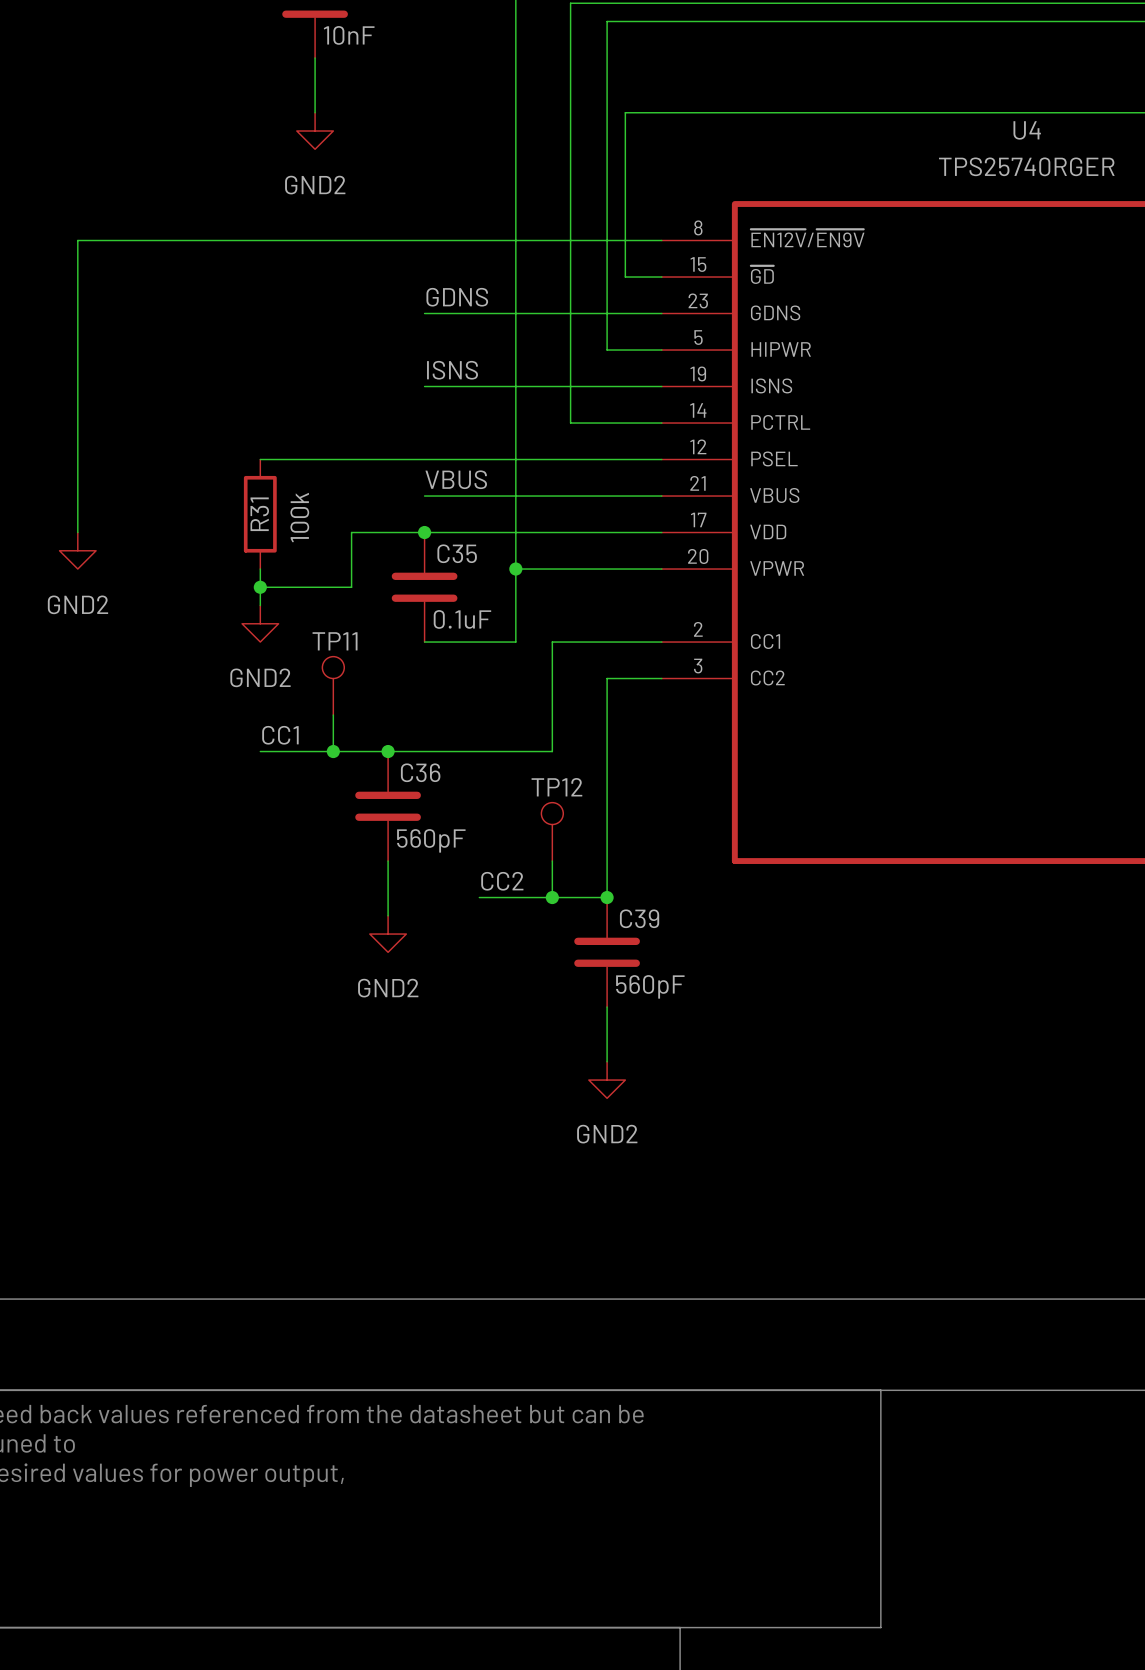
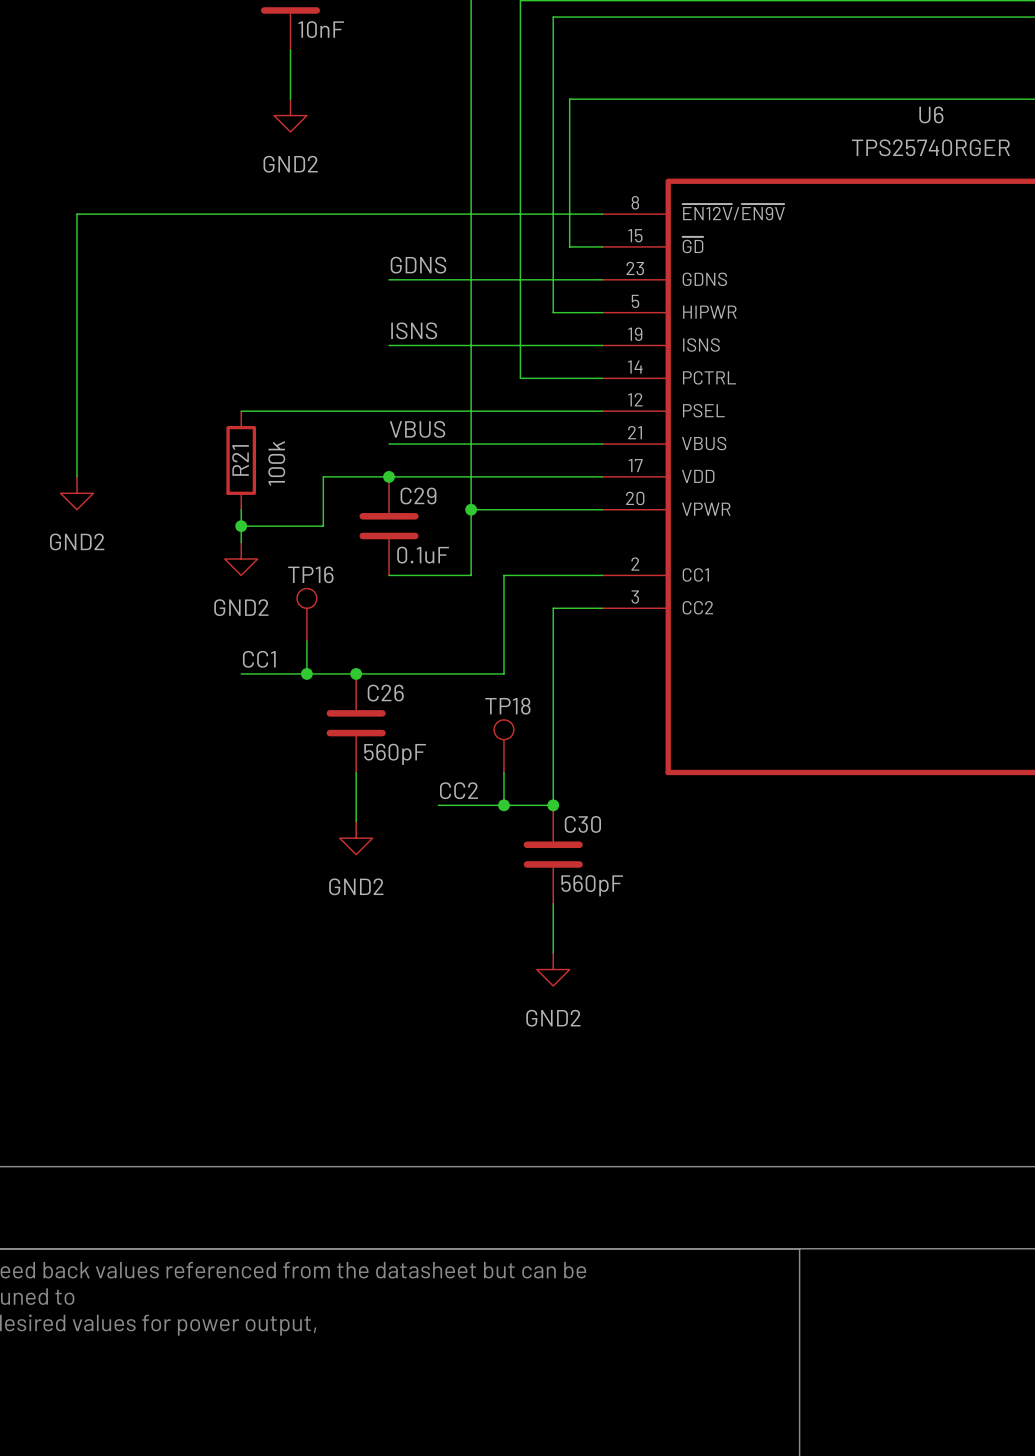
U4 name: U4 (1027, 130) -> U6 (931, 114)
R31 name: R31 (259, 514) -> R21 (240, 460)
C35 name: C35 (457, 553) -> C29 (418, 495)
TP11 name: TP11 (335, 641) -> TP16 (310, 574)
C36 name: C36 (420, 772) -> C26 (385, 693)
TP12 name: TP12 (556, 787) -> TP18 (507, 706)
C39 name: C39 (639, 918) -> C30 (582, 824)

